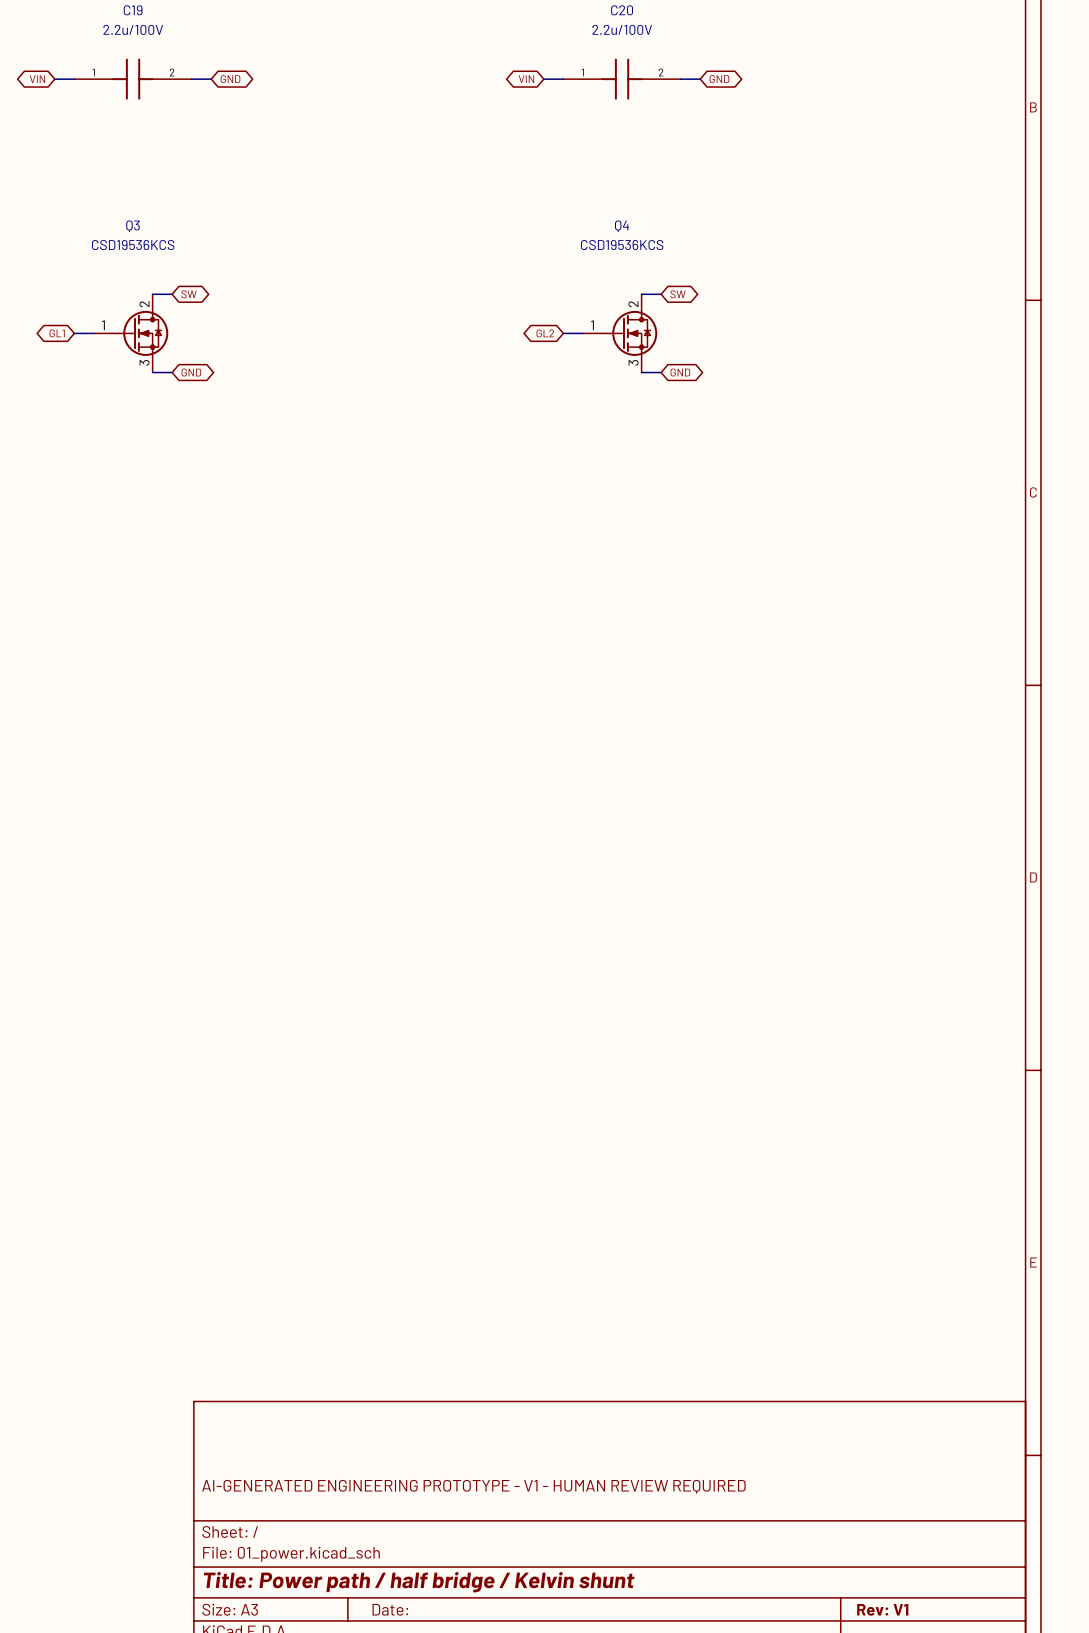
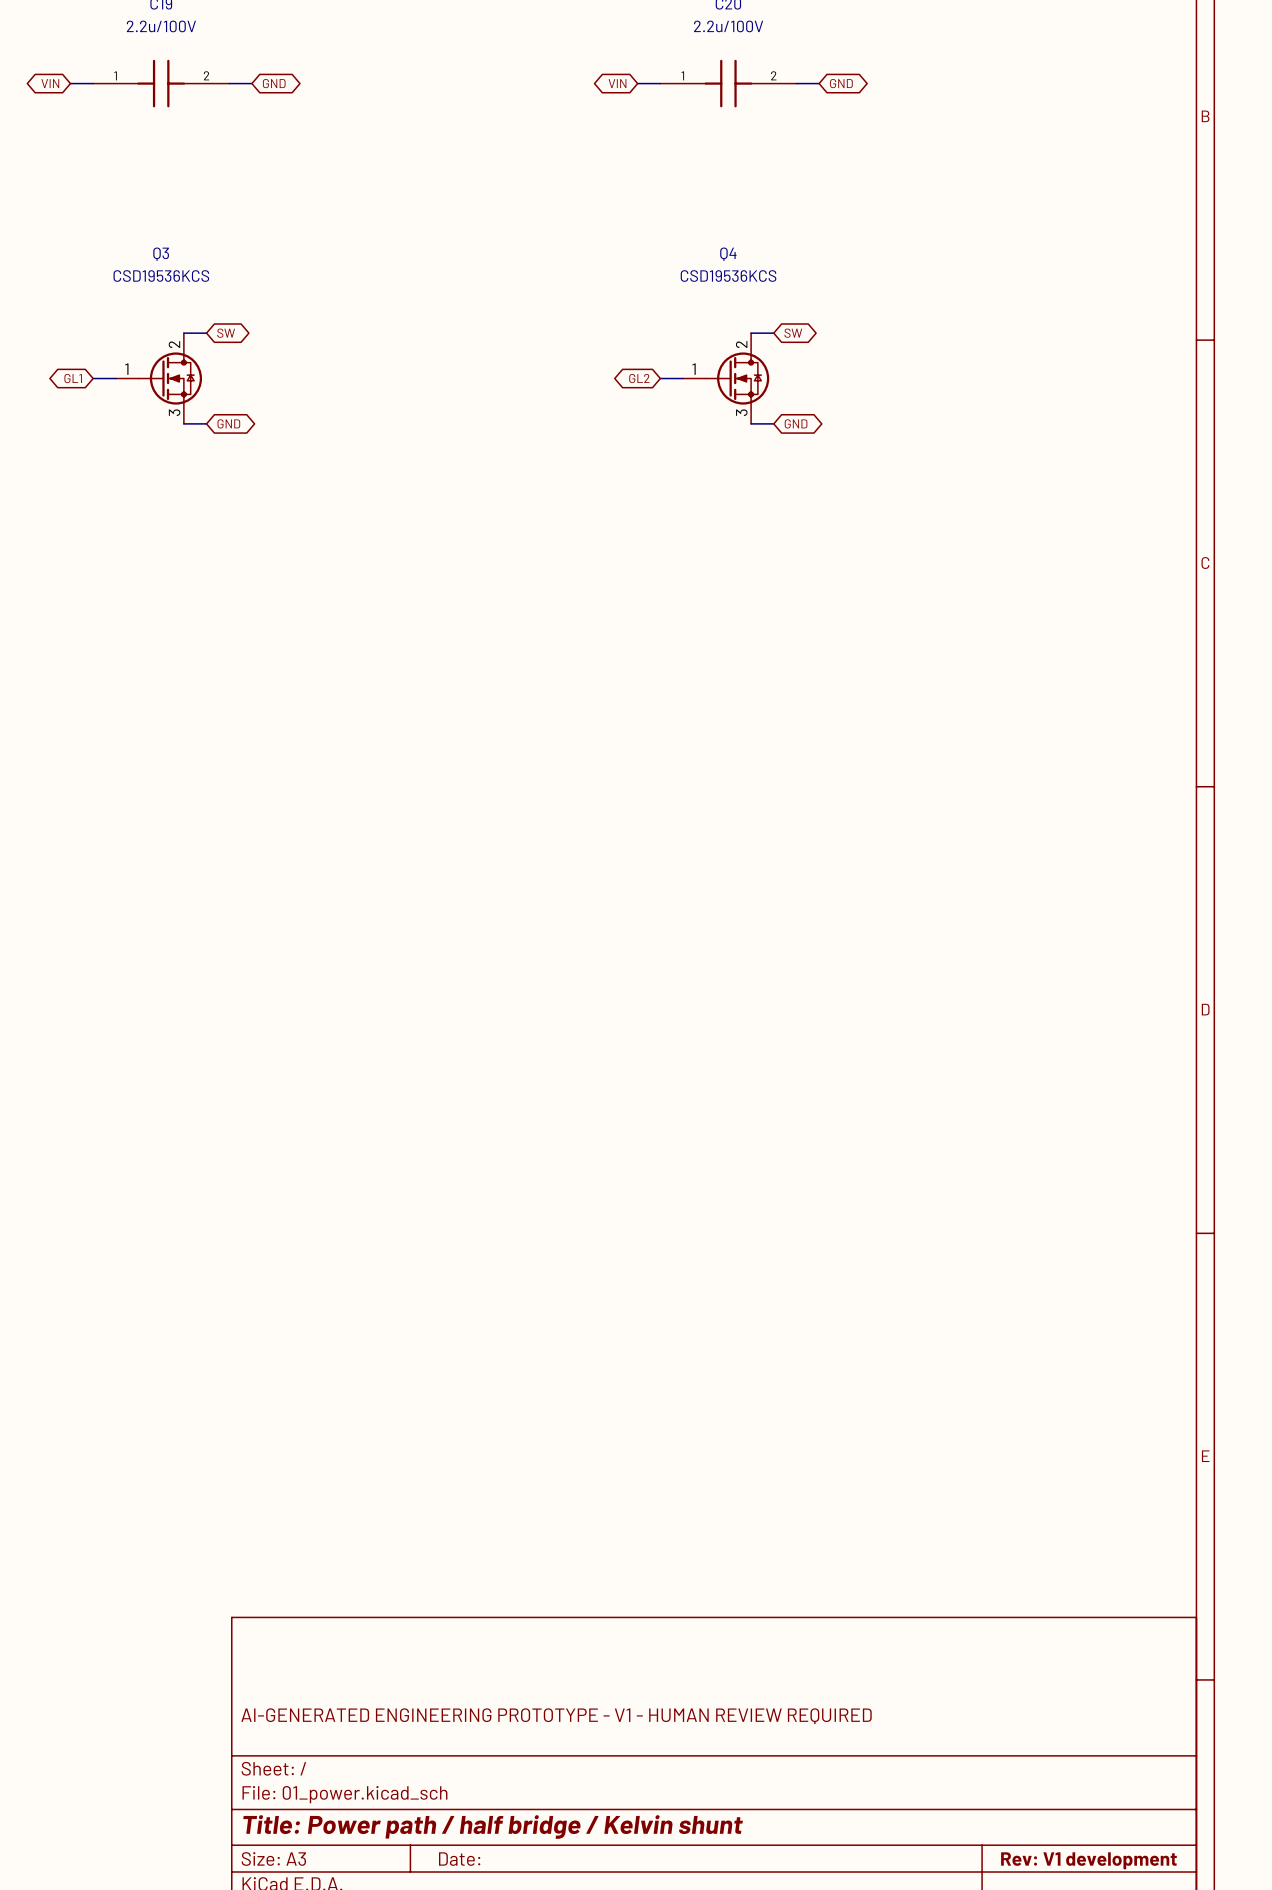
title block: Rev: V1 (882, 1609) -> Rev: V1 development (1088, 1860)

